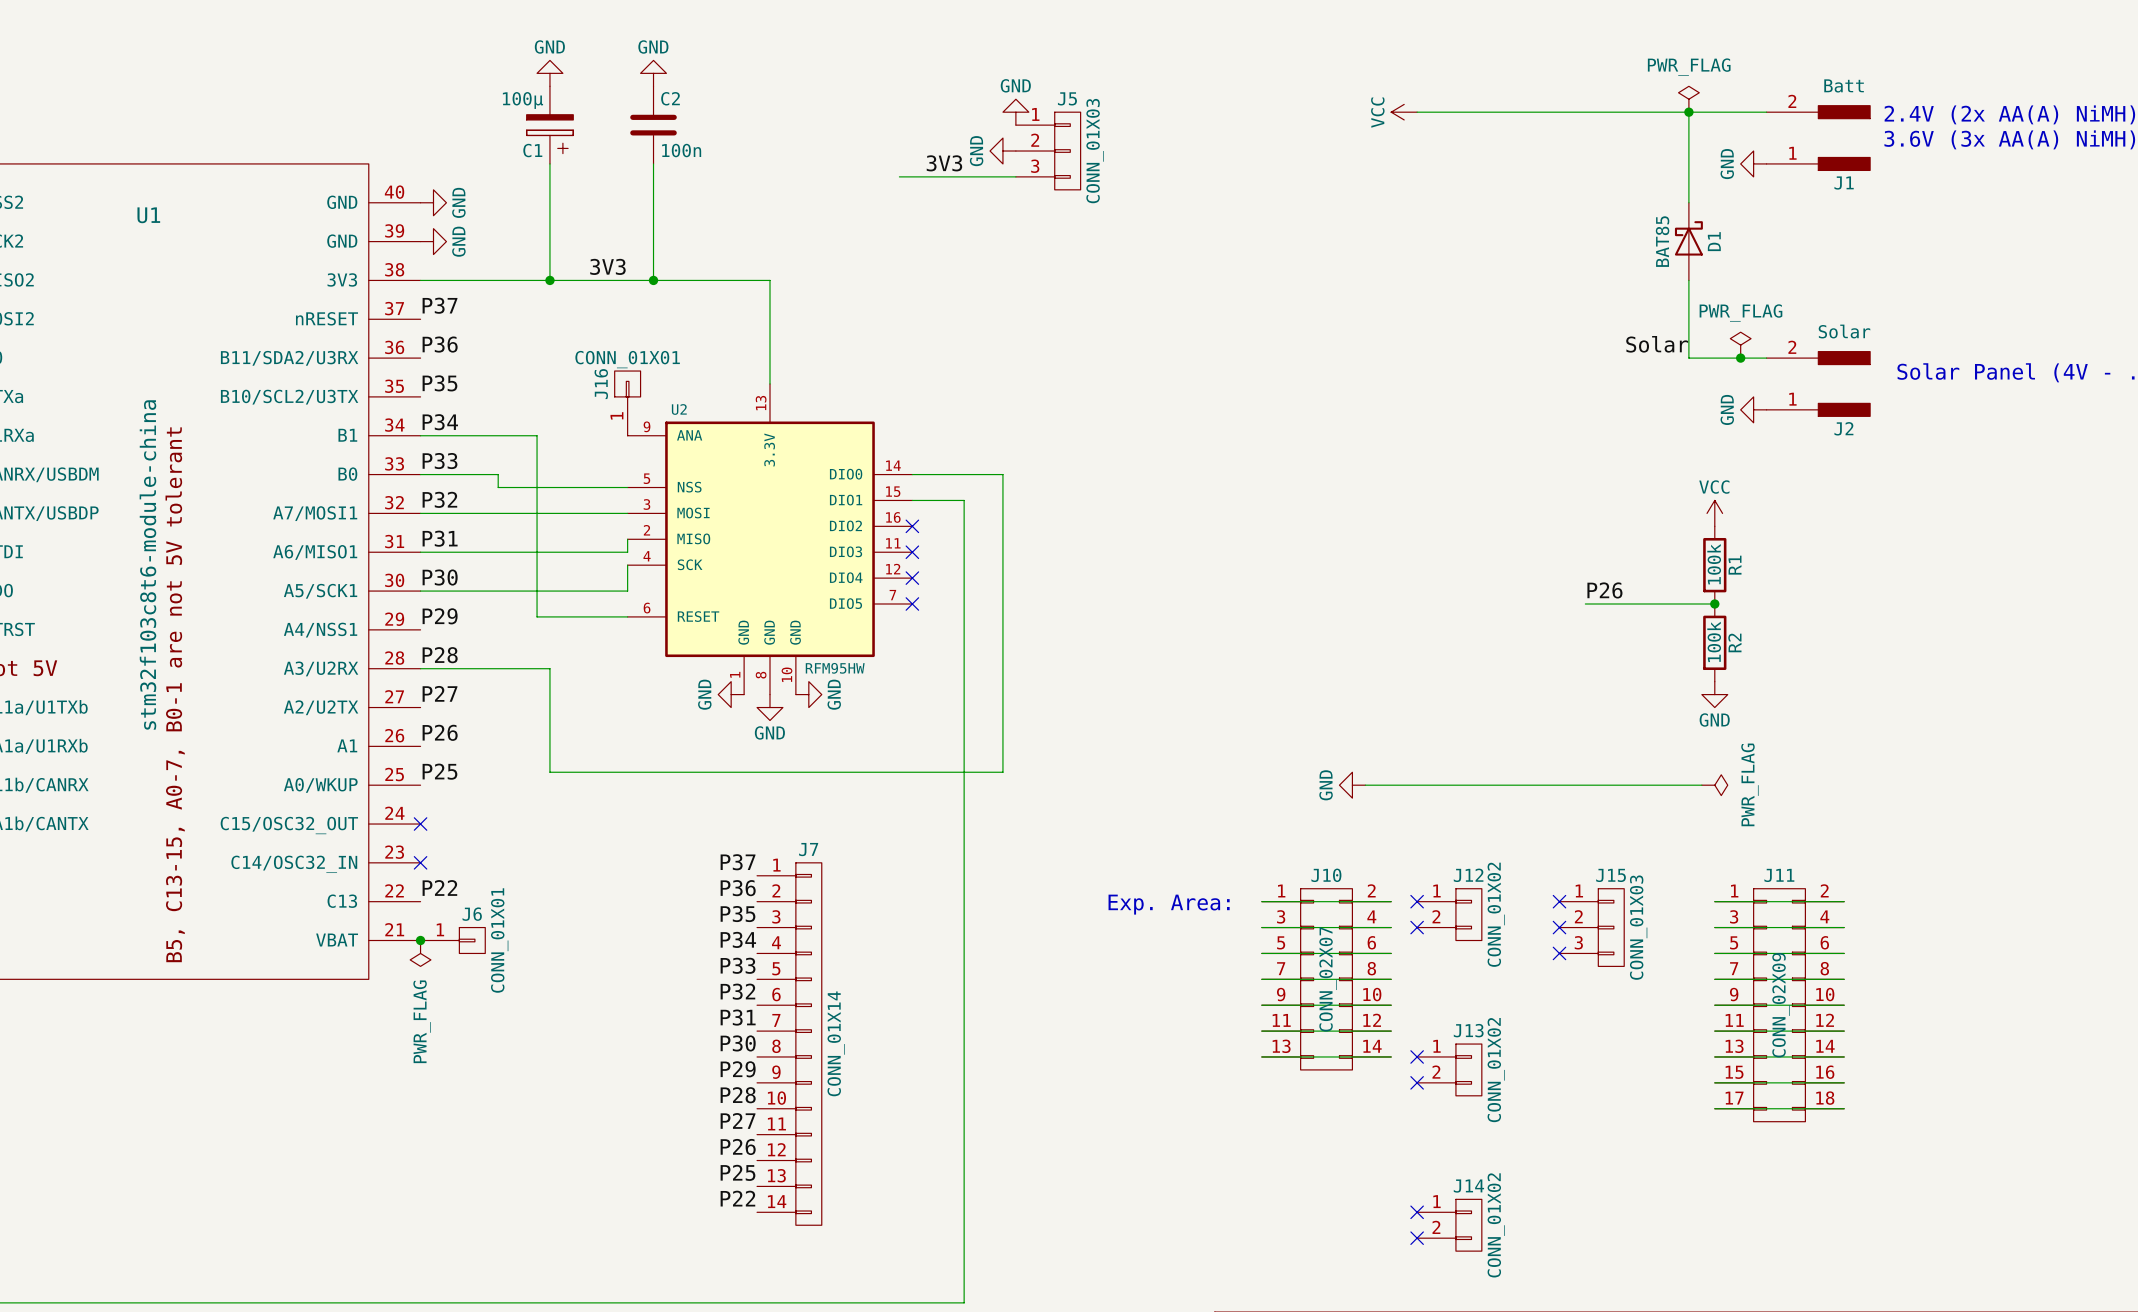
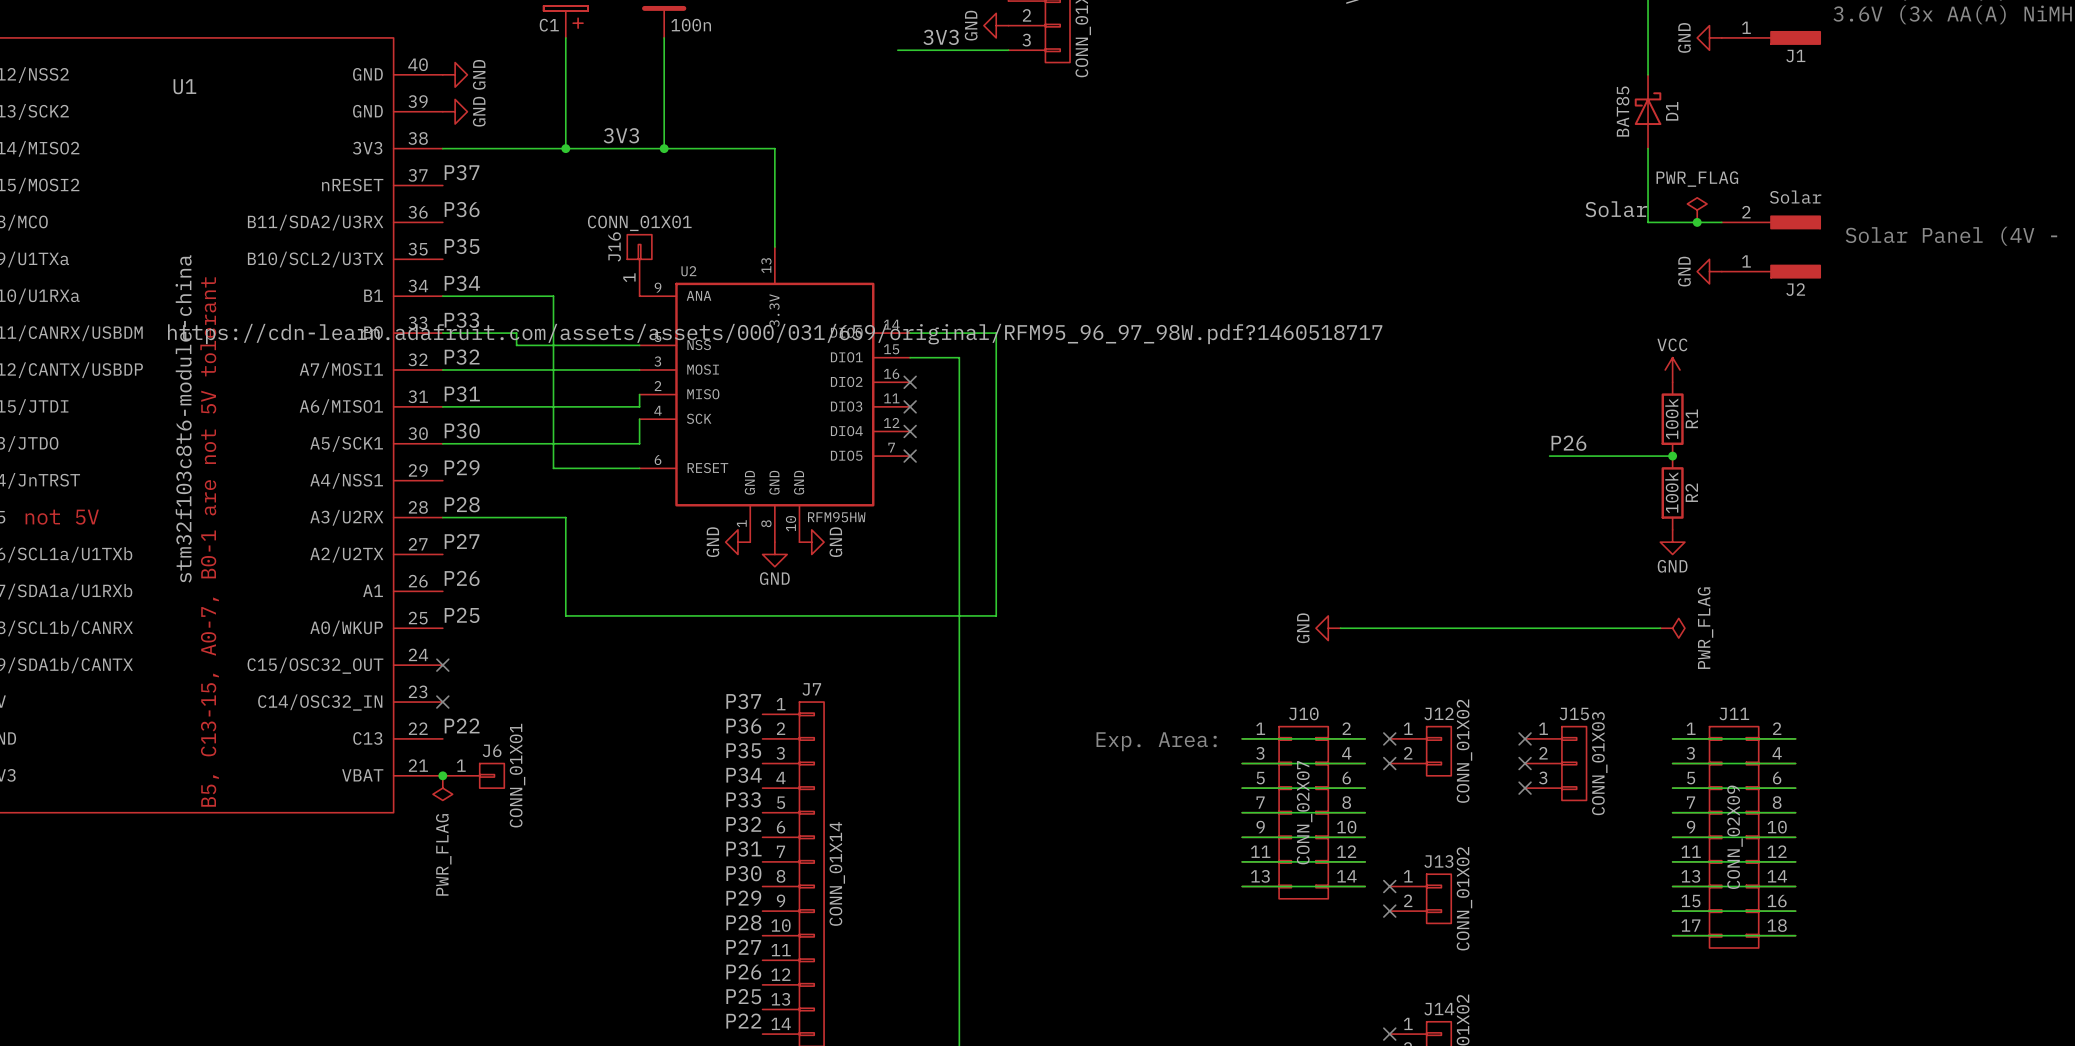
U2 text: none -> https://cdn-learn.adafruit.com/assets/assets/000/031/659/original/RFM95_96_97_98W.pdf?1460518717 (775, 334)

